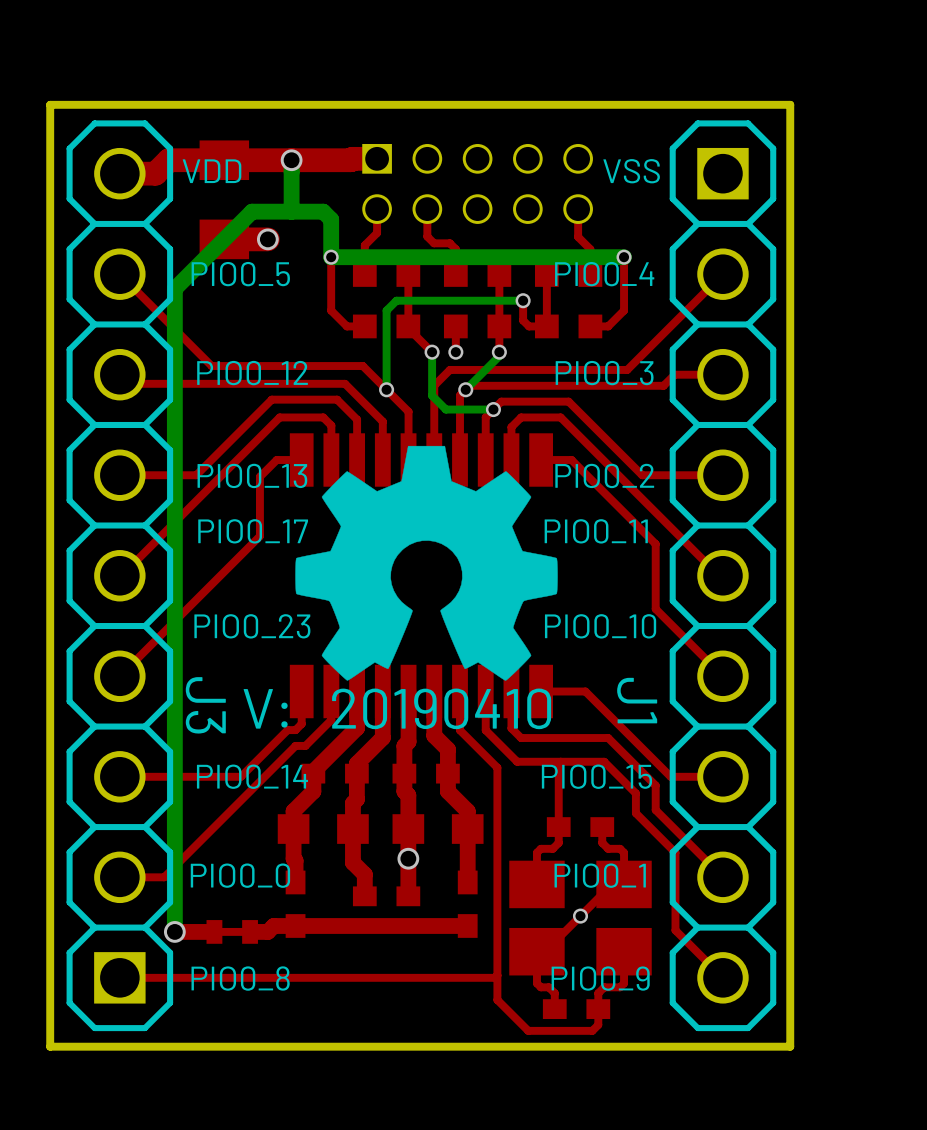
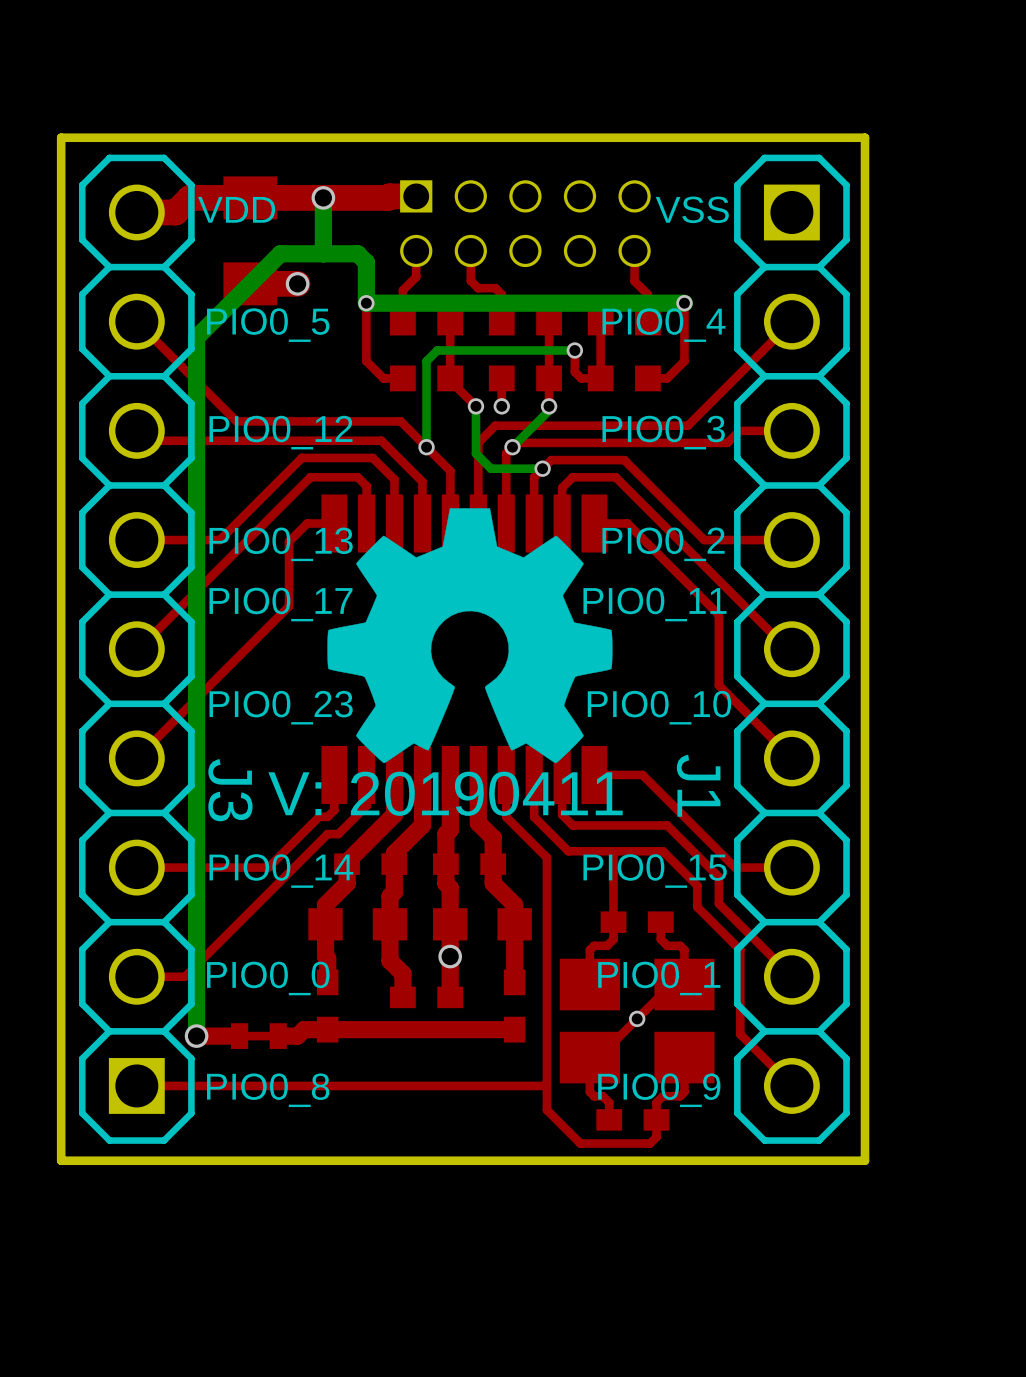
drawing shape: [243, 688, 552, 730] -> [268, 771, 623, 816]

